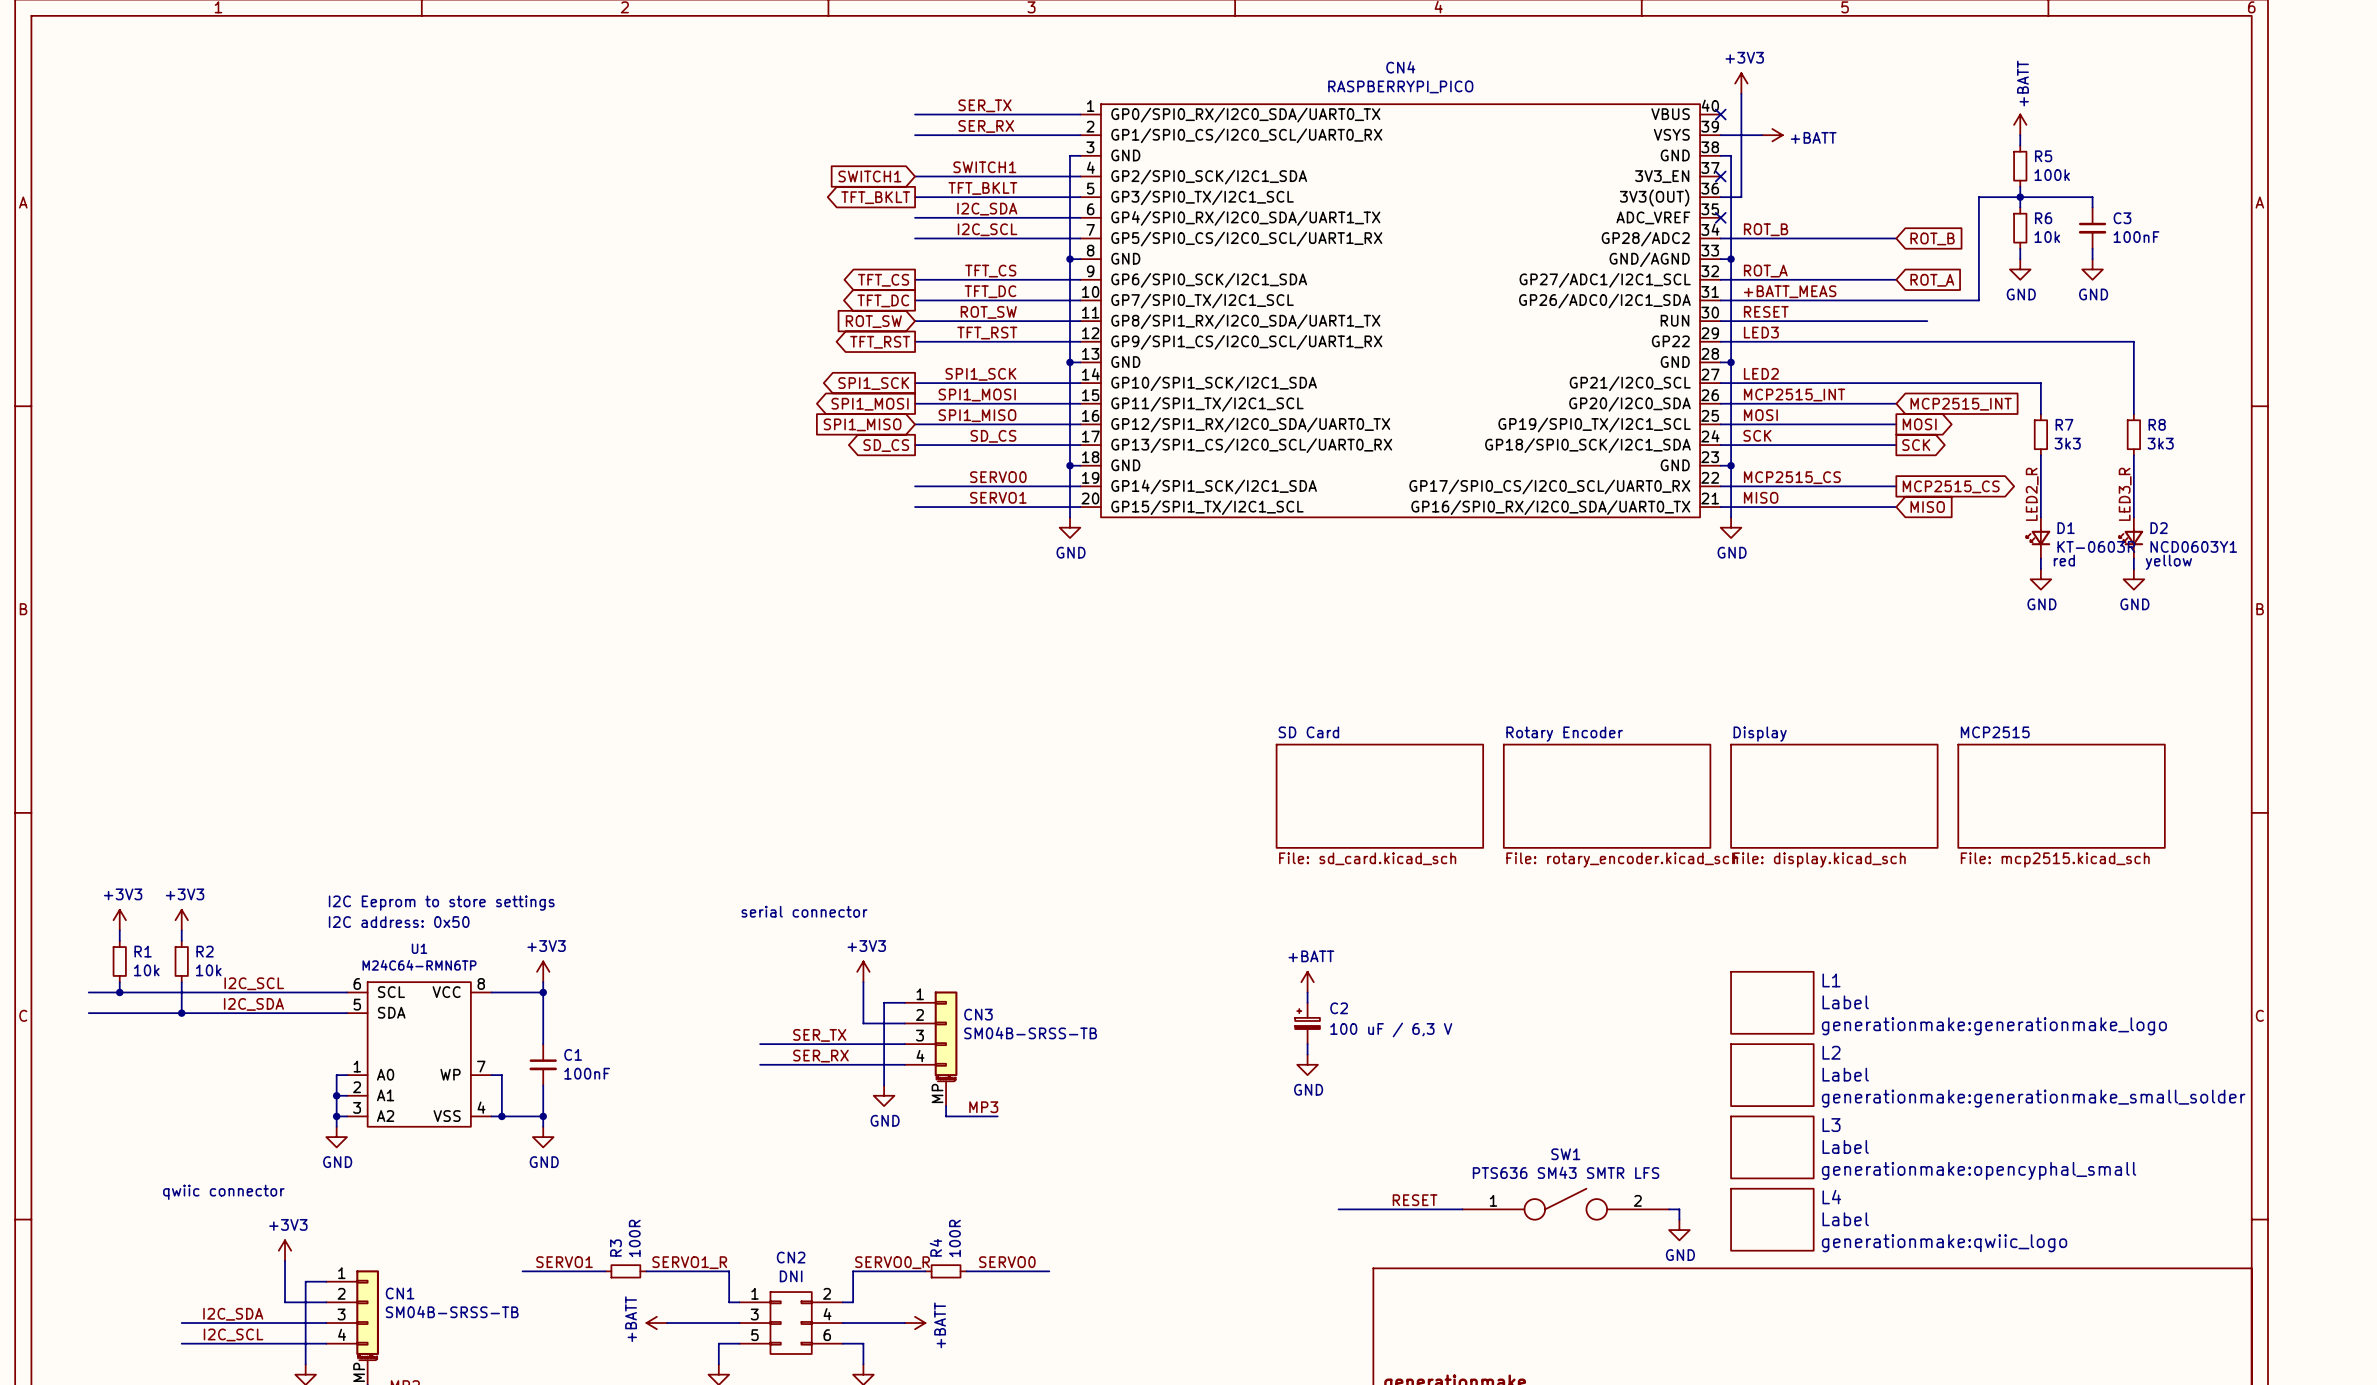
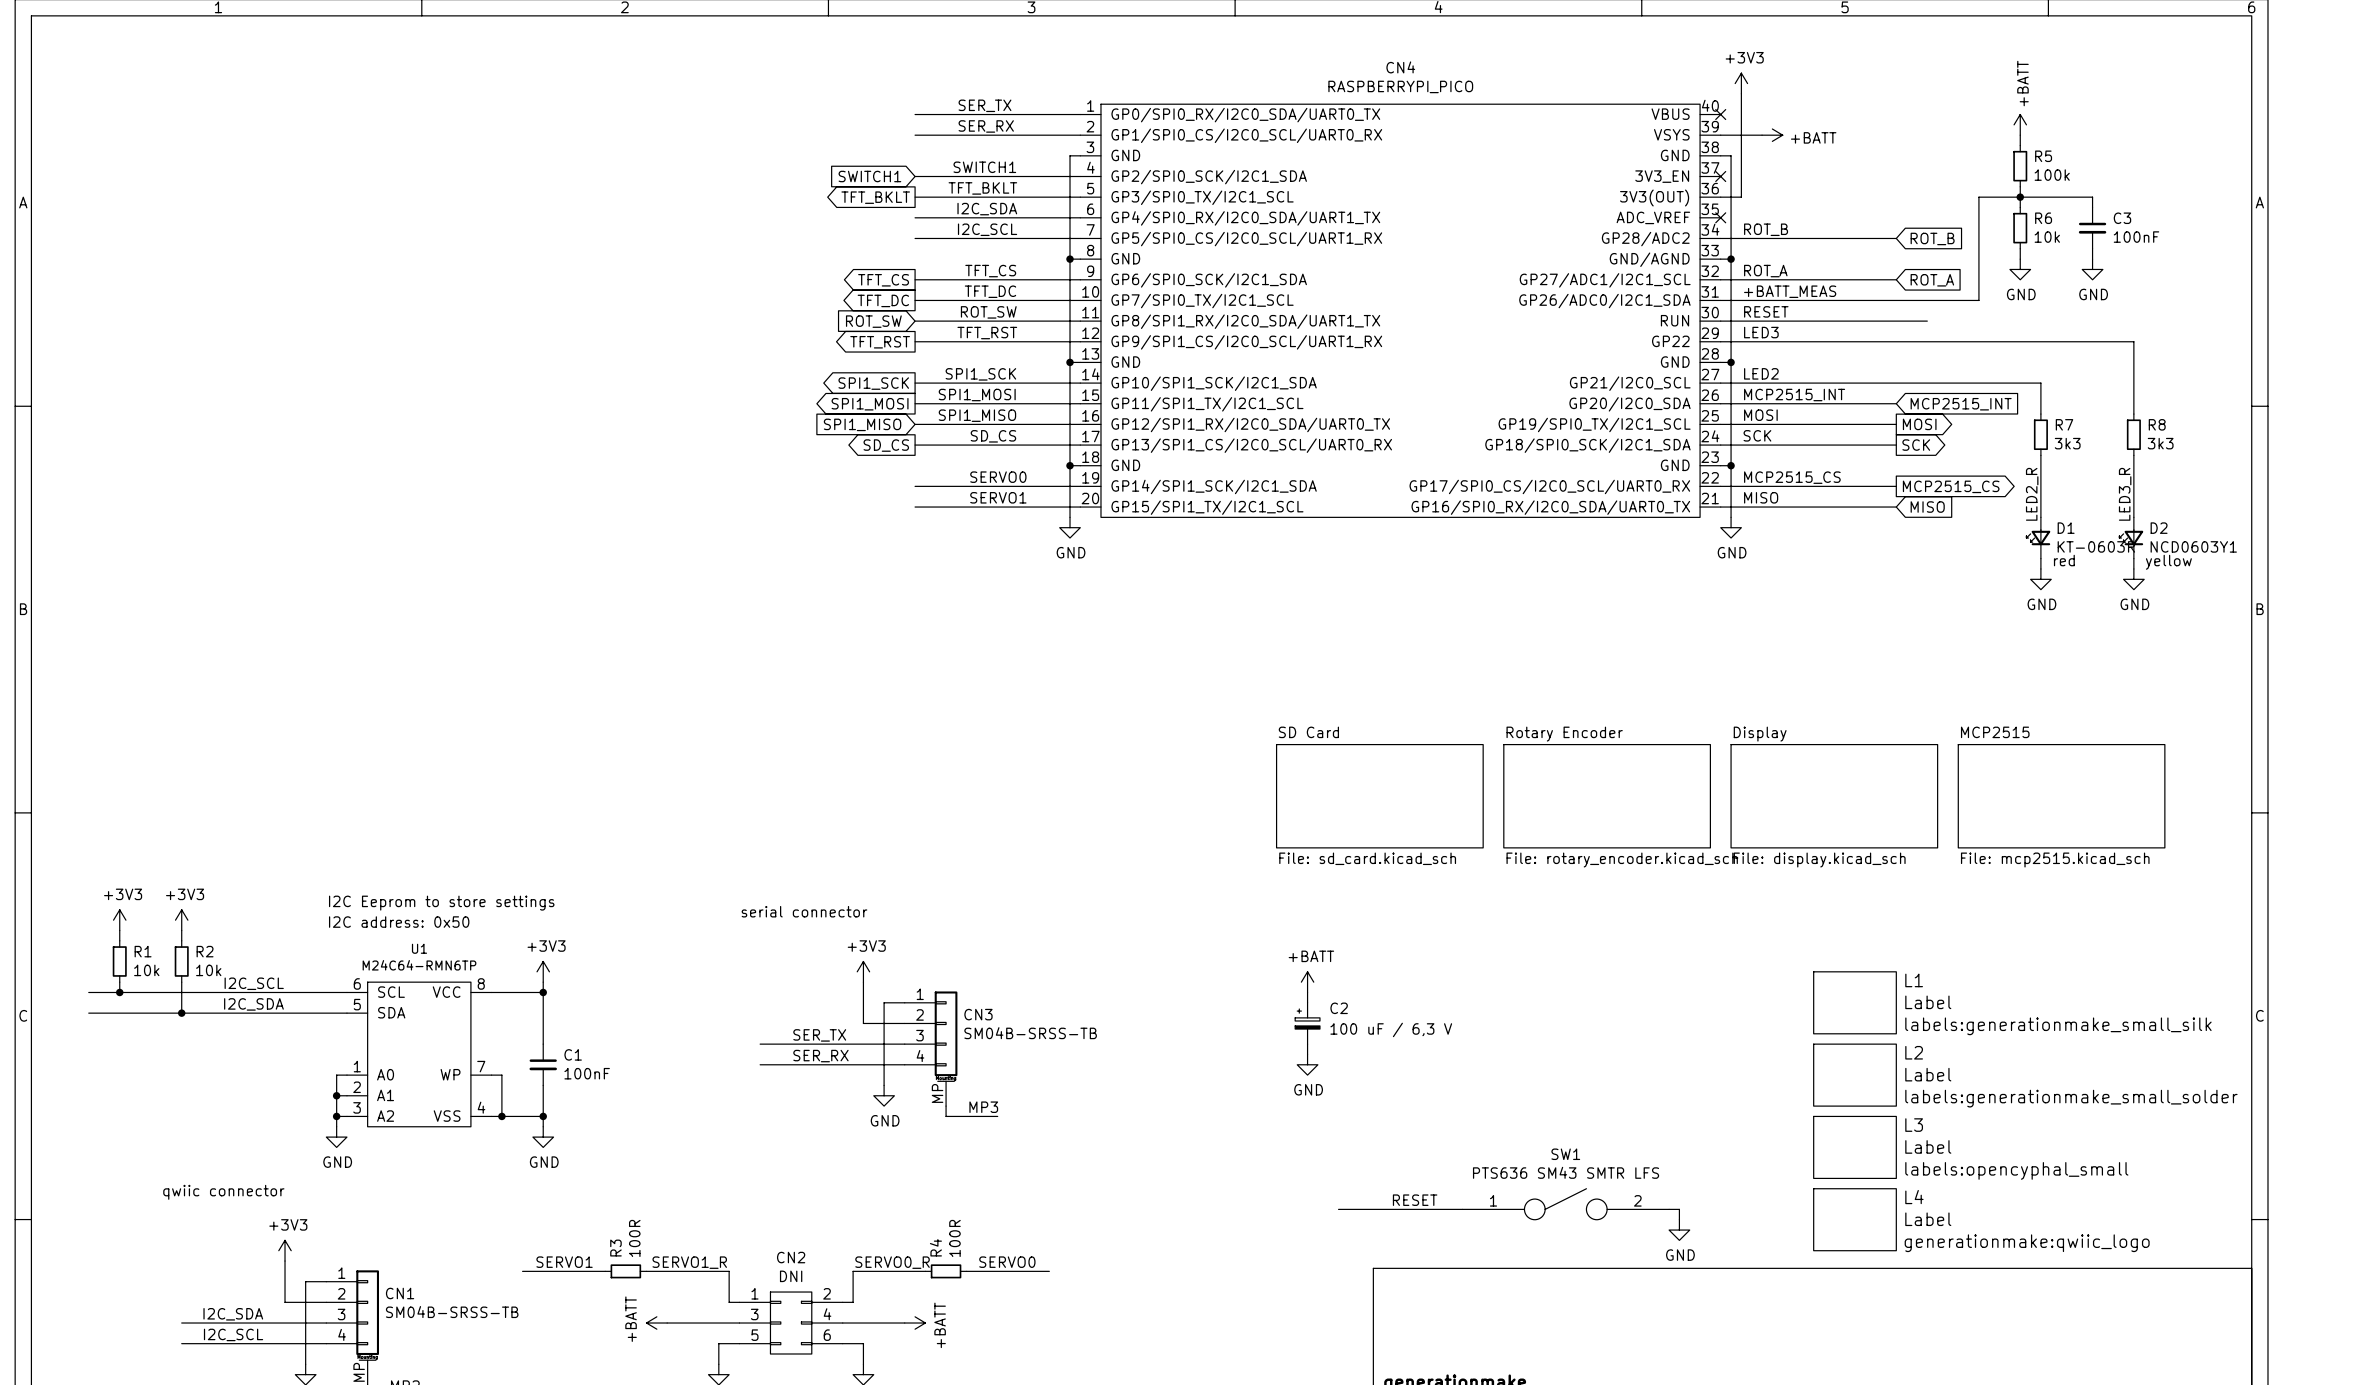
L1 position: (1772, 1002) -> (1855, 1002)
L1 text: generationmake:generationmake_logo (1994, 1026) -> labels:generationmake_small_silk (2058, 1026)
L2 position: (1772, 1075) -> (1855, 1075)
L2 text: generationmake:generationmake_small_solder (2033, 1098) -> labels:generationmake_small_solder (2071, 1098)
L3 position: (1772, 1147) -> (1855, 1147)
L3 text: generationmake:opencyphal_small (1979, 1170) -> labels:opencyphal_small (2016, 1170)
L4 position: (1772, 1219) -> (1855, 1219)

